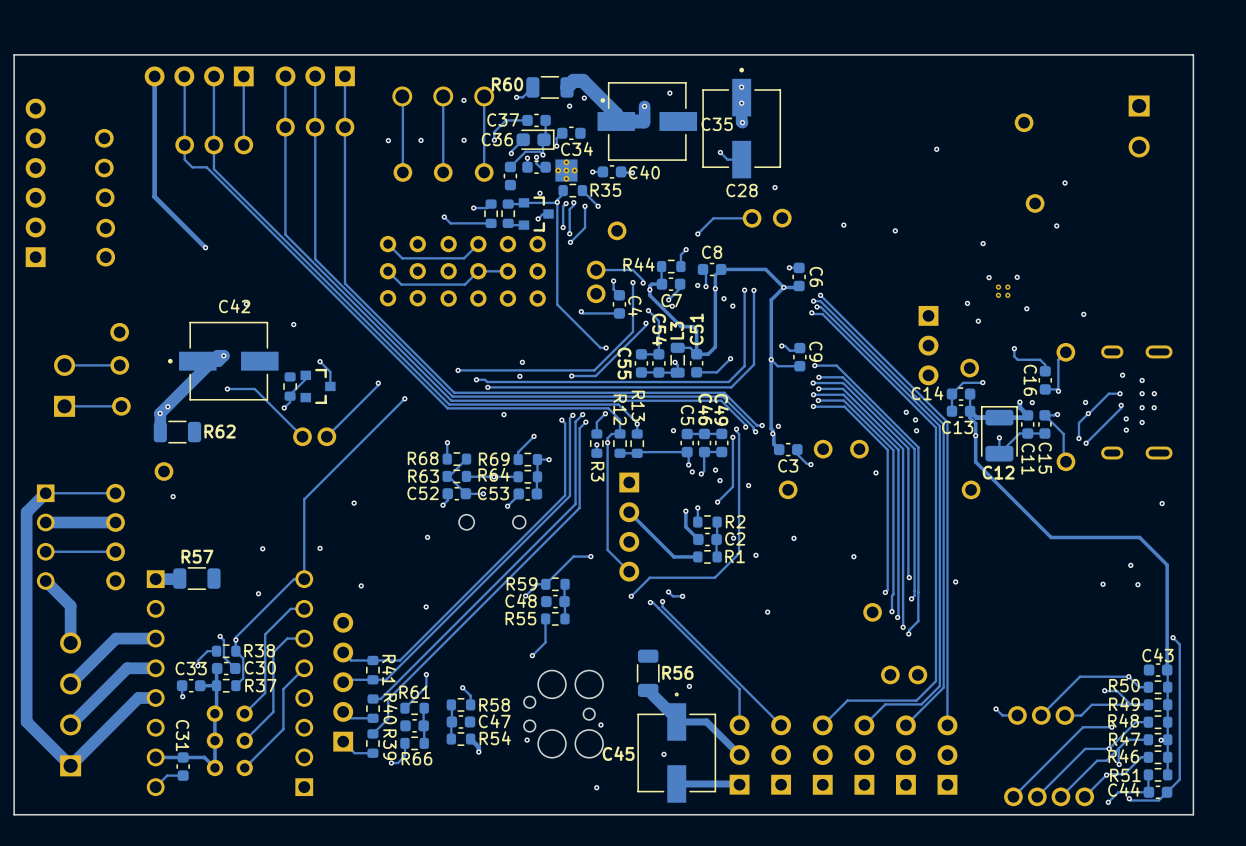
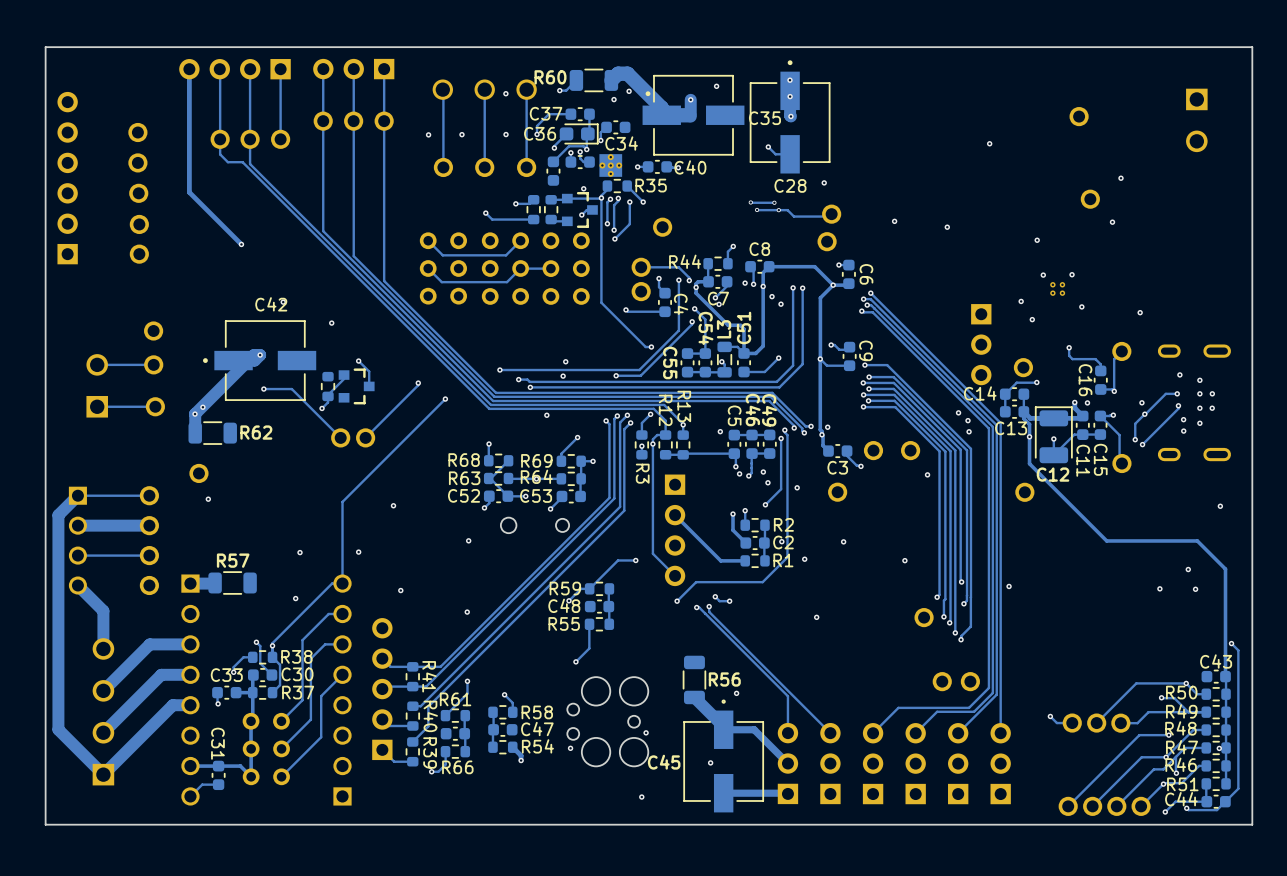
track: none -> (750, 202) (774, 202)
via: none -> (750, 202)
via: none -> (774, 202)
track: none -> (757, 209) (787, 210) (794, 216) (827, 216)
via: none -> (757, 209)
via: none -> (778, 210)
track: (752, 218) (713, 218) (697, 234) -> none
part position: (752, 218) -> (827, 241)
via: (697, 234) -> none

